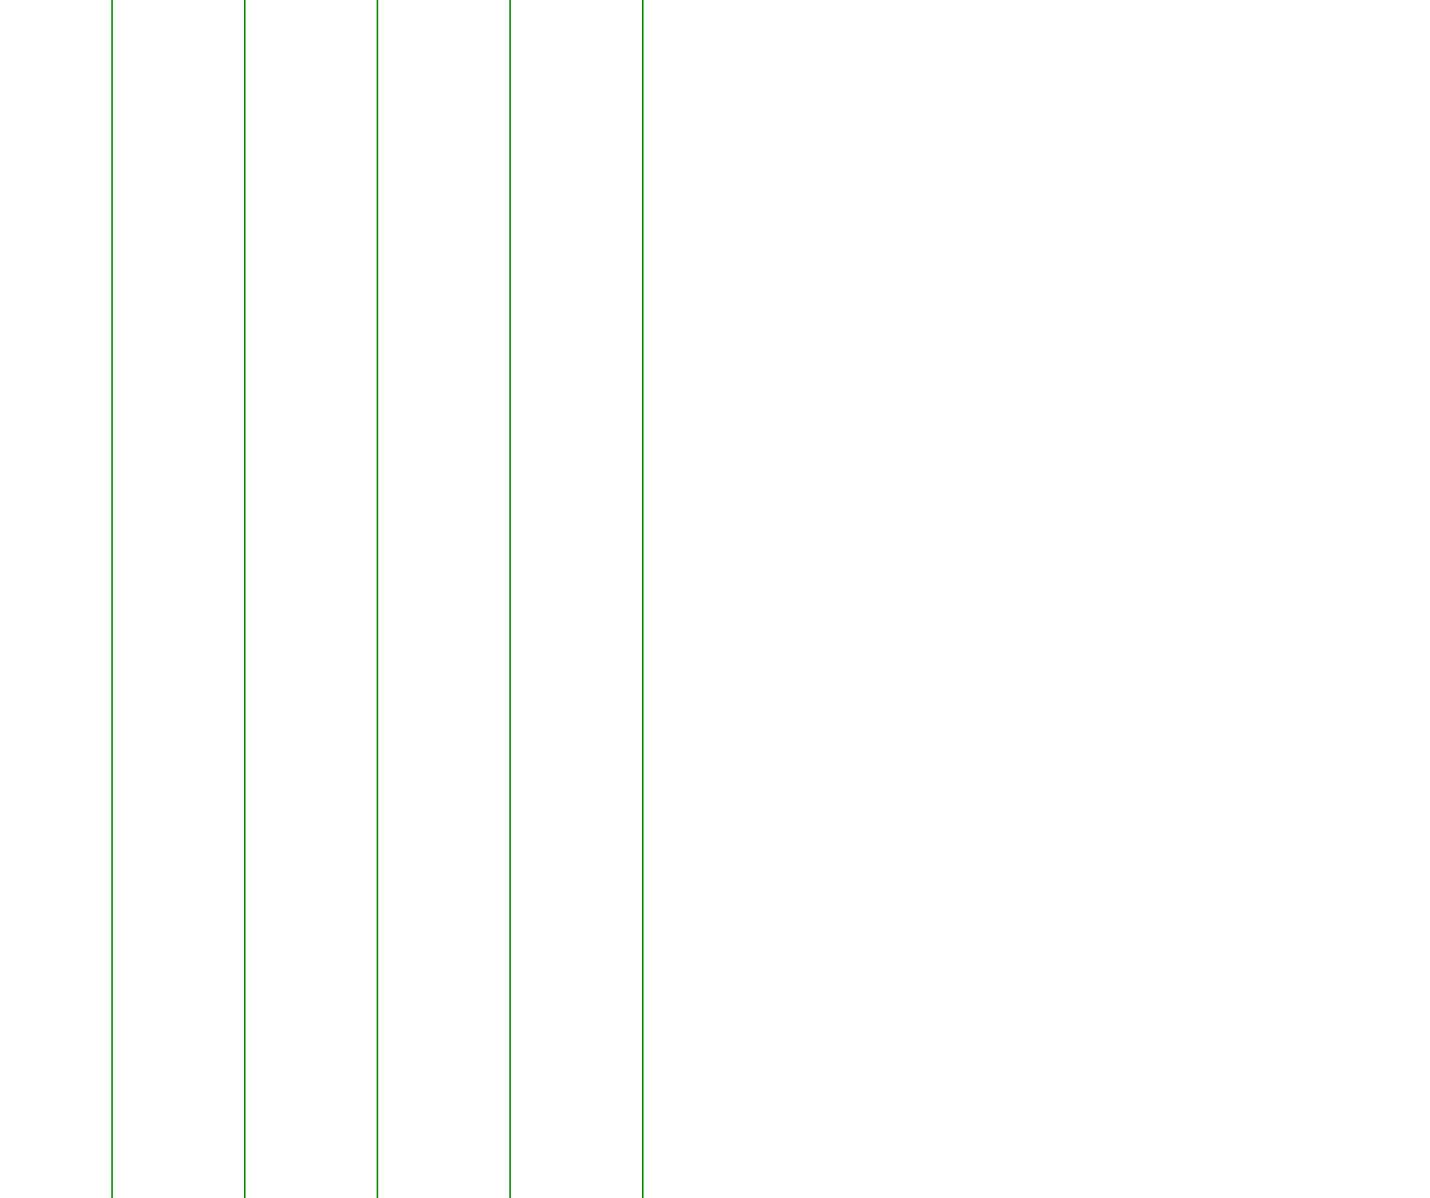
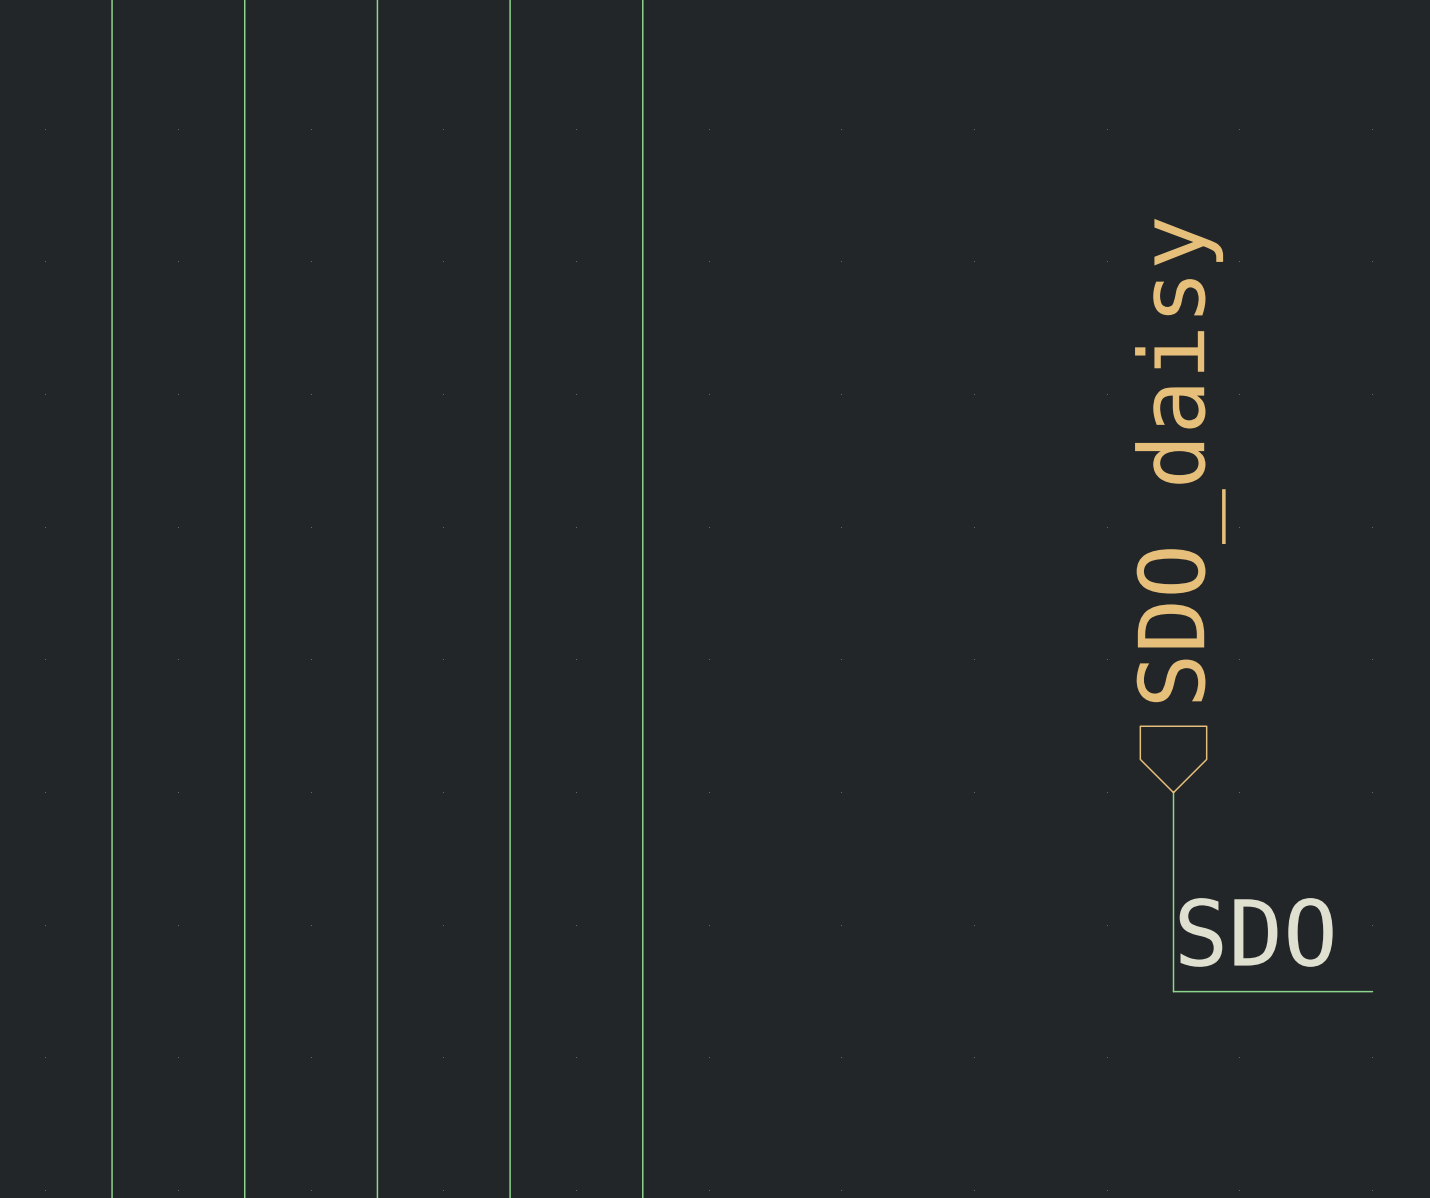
hierarchical label: none -> SDO_daisy (1180, 460)
wire: none -> (1173, 792) (1173, 991) (1372, 991)
label: none -> SDO (1256, 932)

